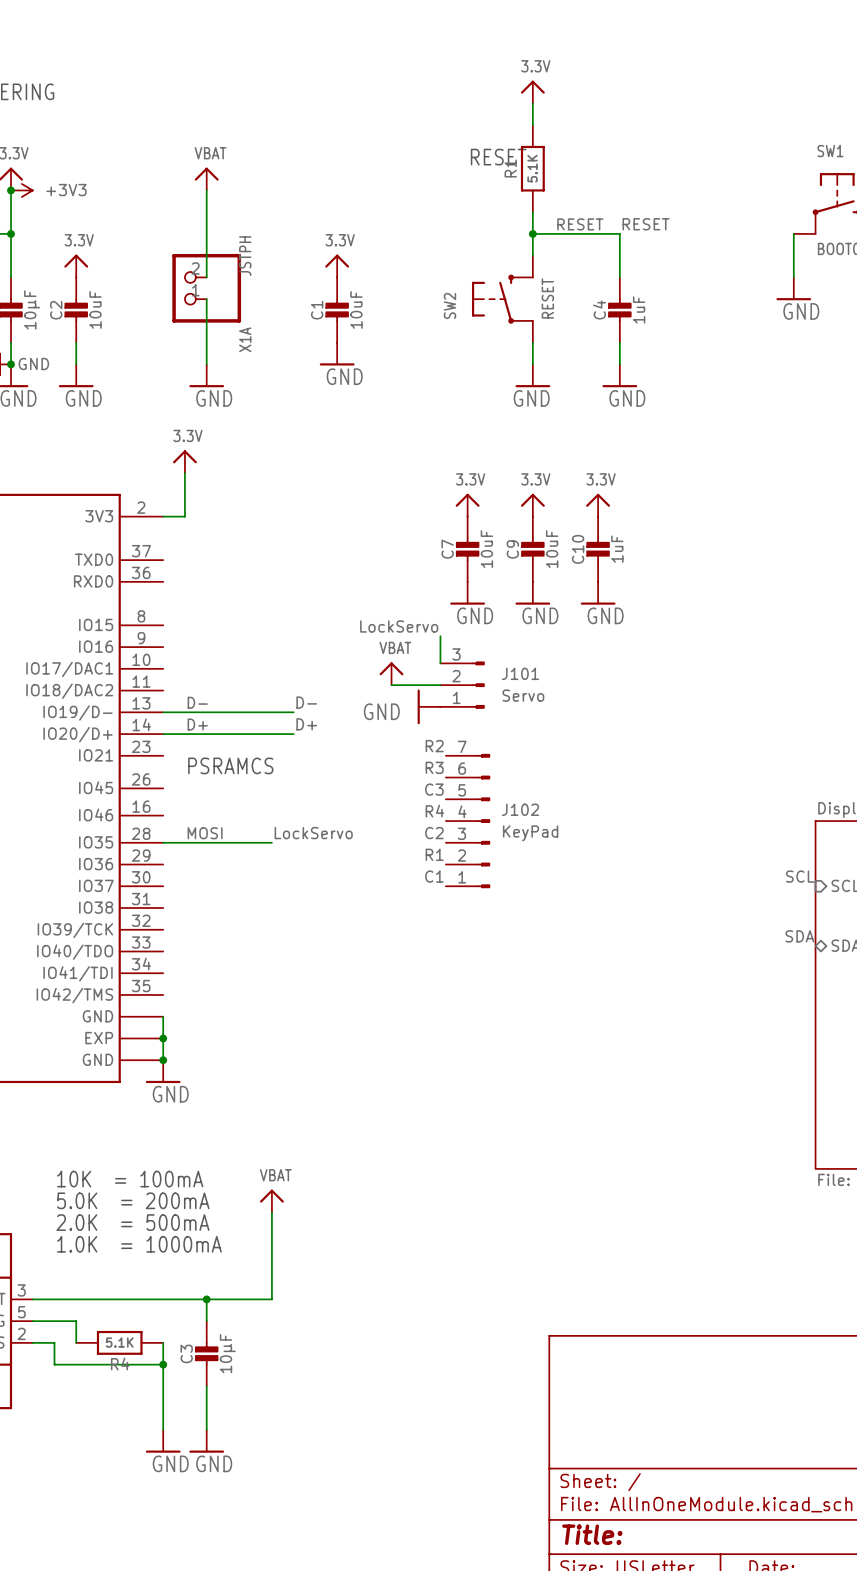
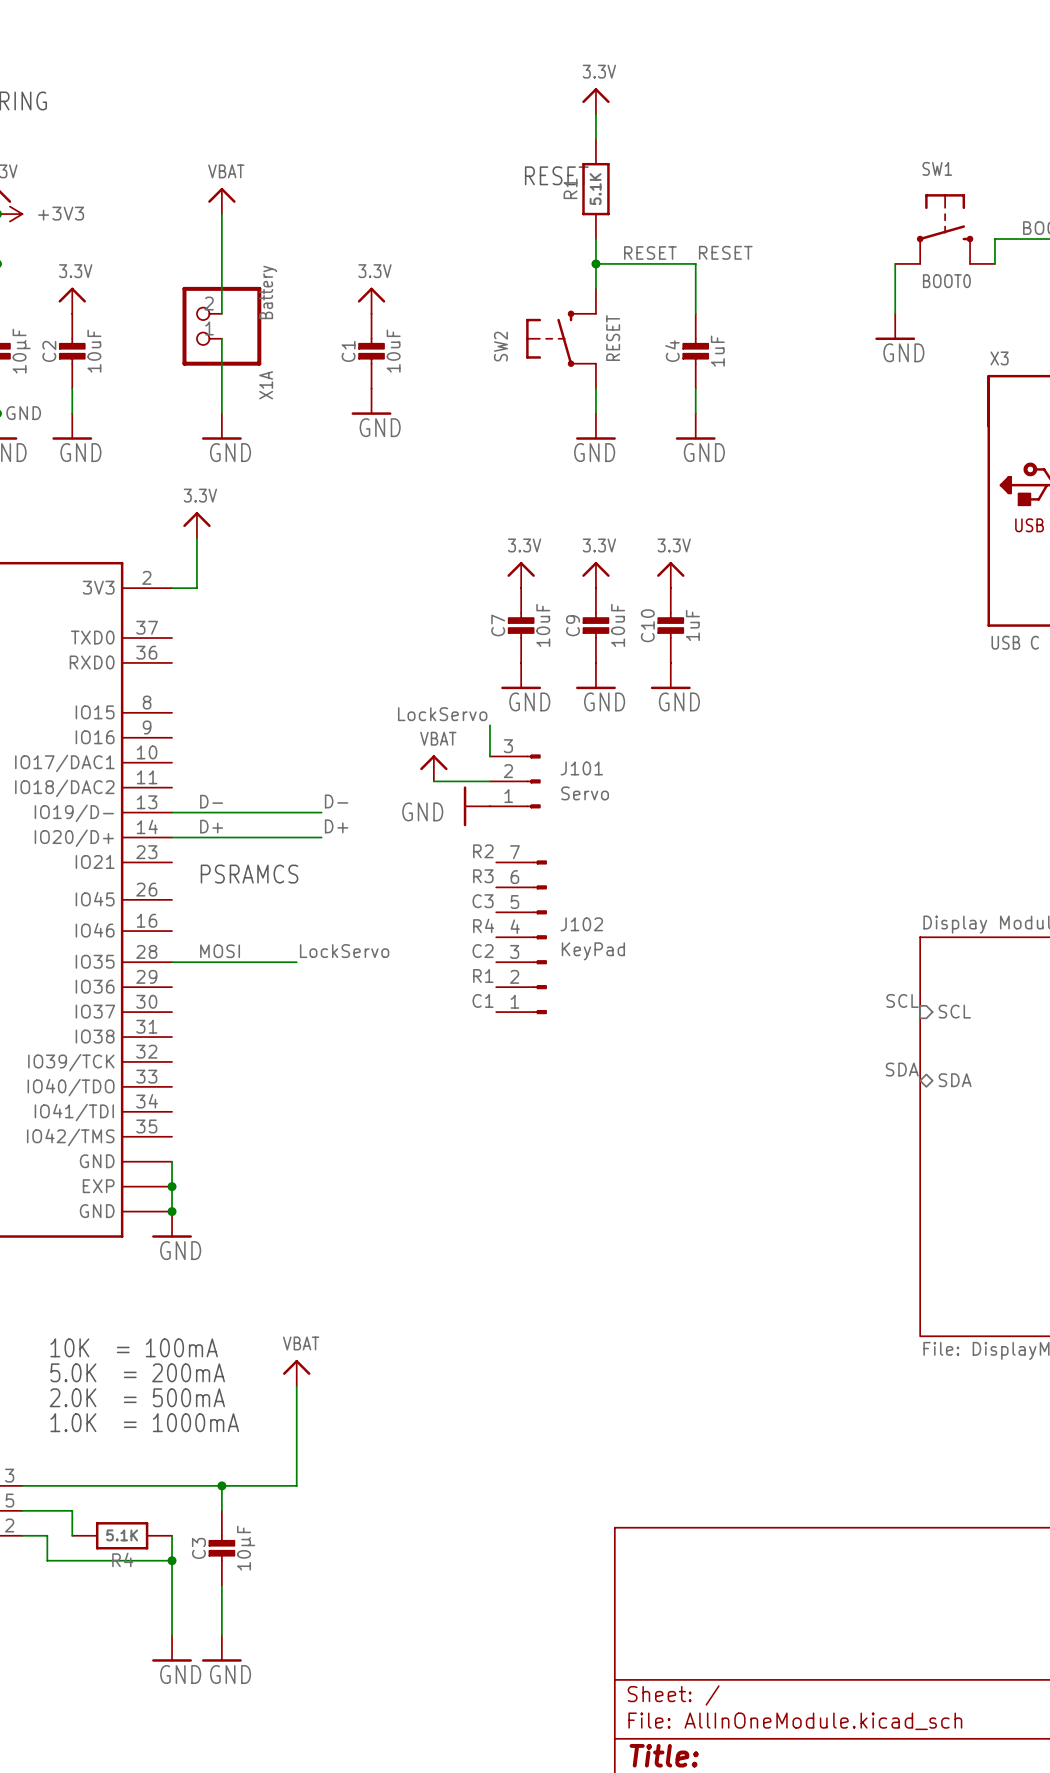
X1A value: JSTPH (245, 256) -> Battery (268, 292)

